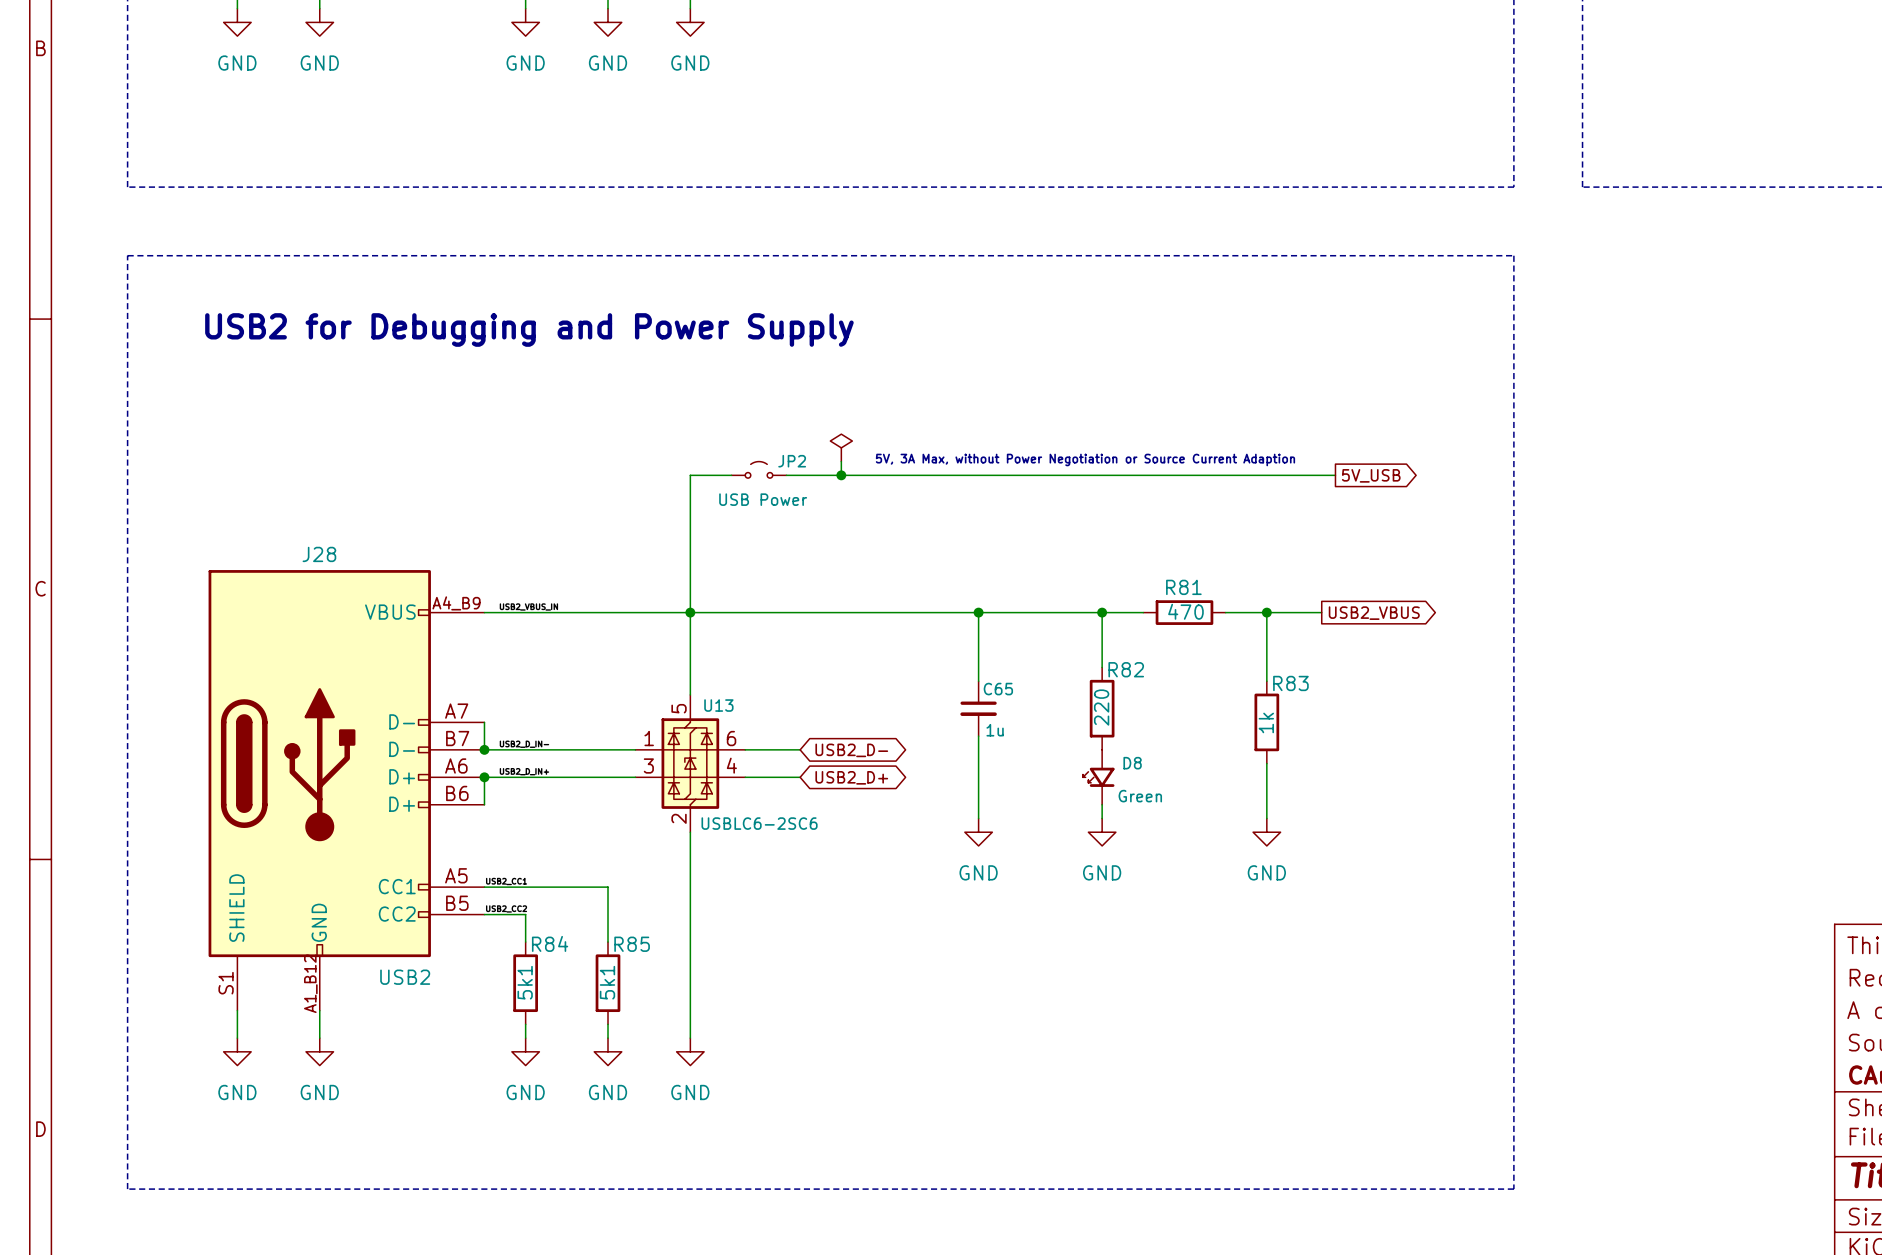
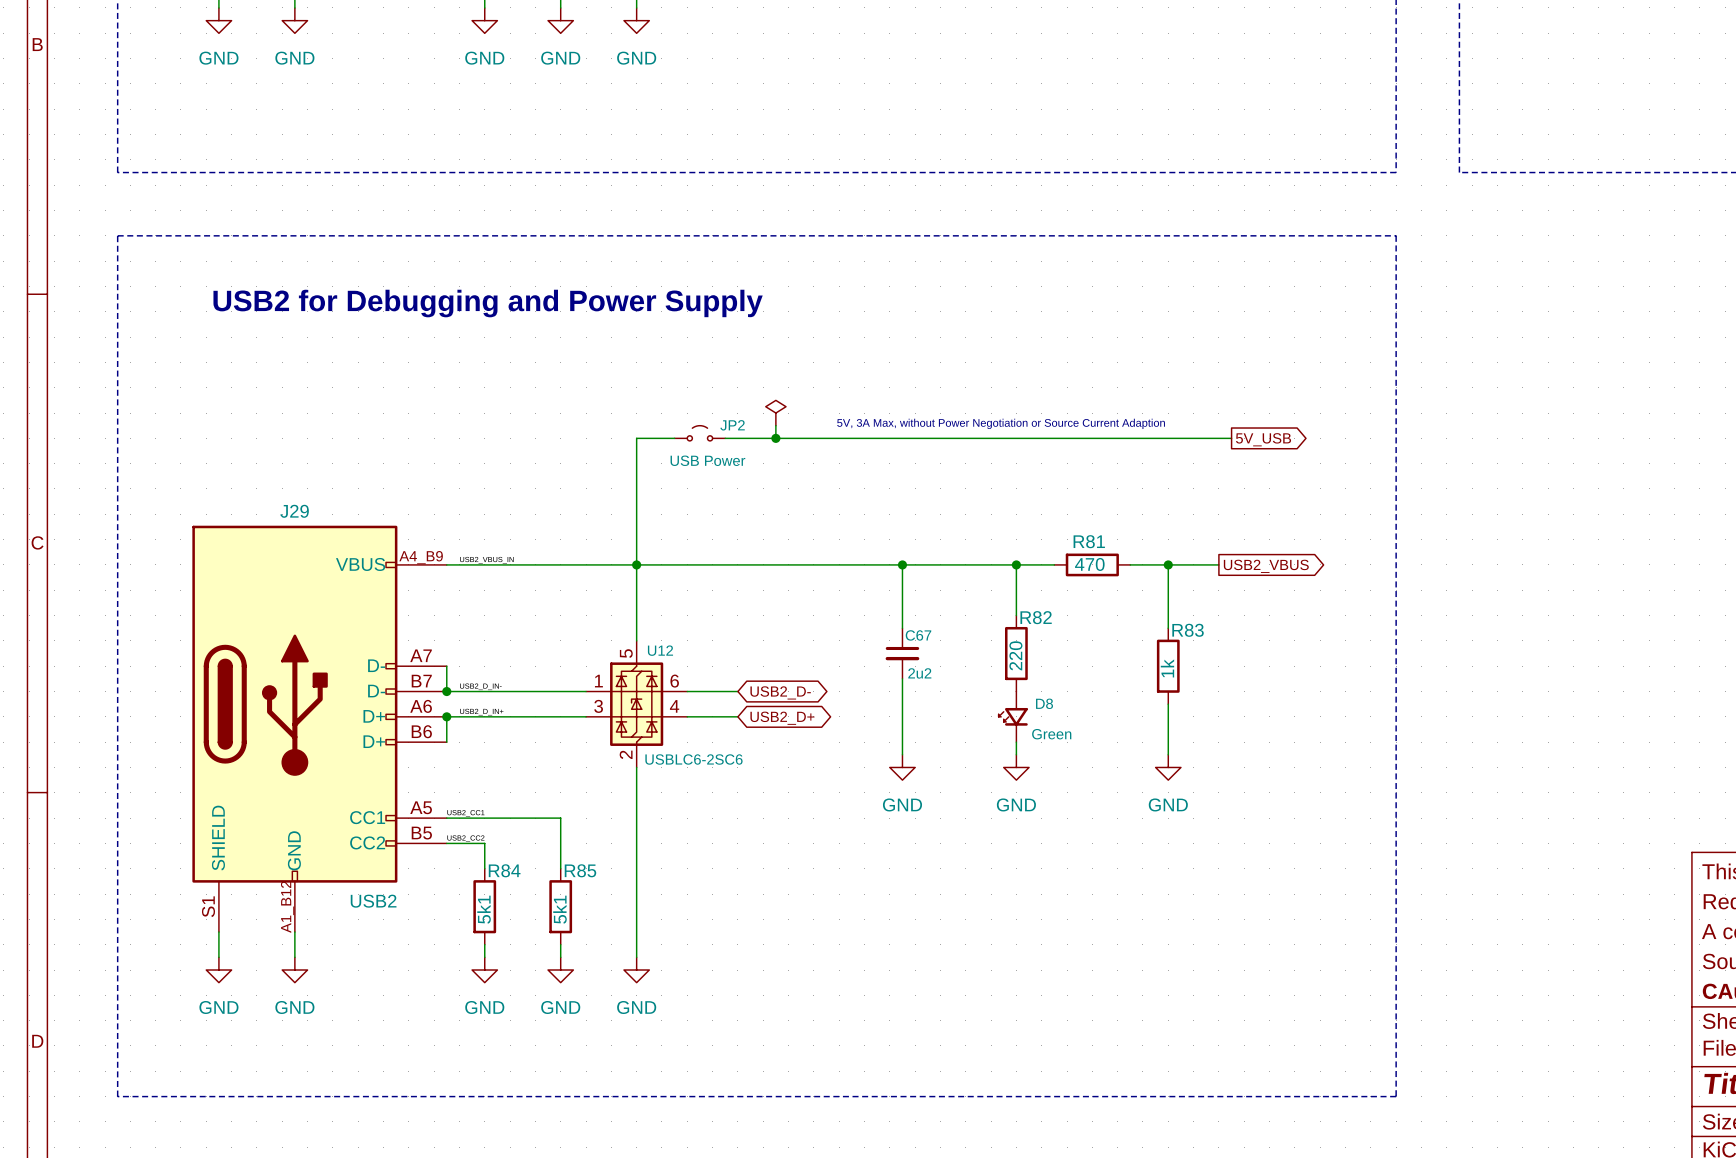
J28 name: J28 (319, 554) -> J29 (294, 511)
C65 name: C65 (998, 689) -> C67 (918, 635)
U13 name: U13 (718, 705) -> U12 (660, 650)
C65 value: 1u (995, 730) -> 2u2 (919, 673)

